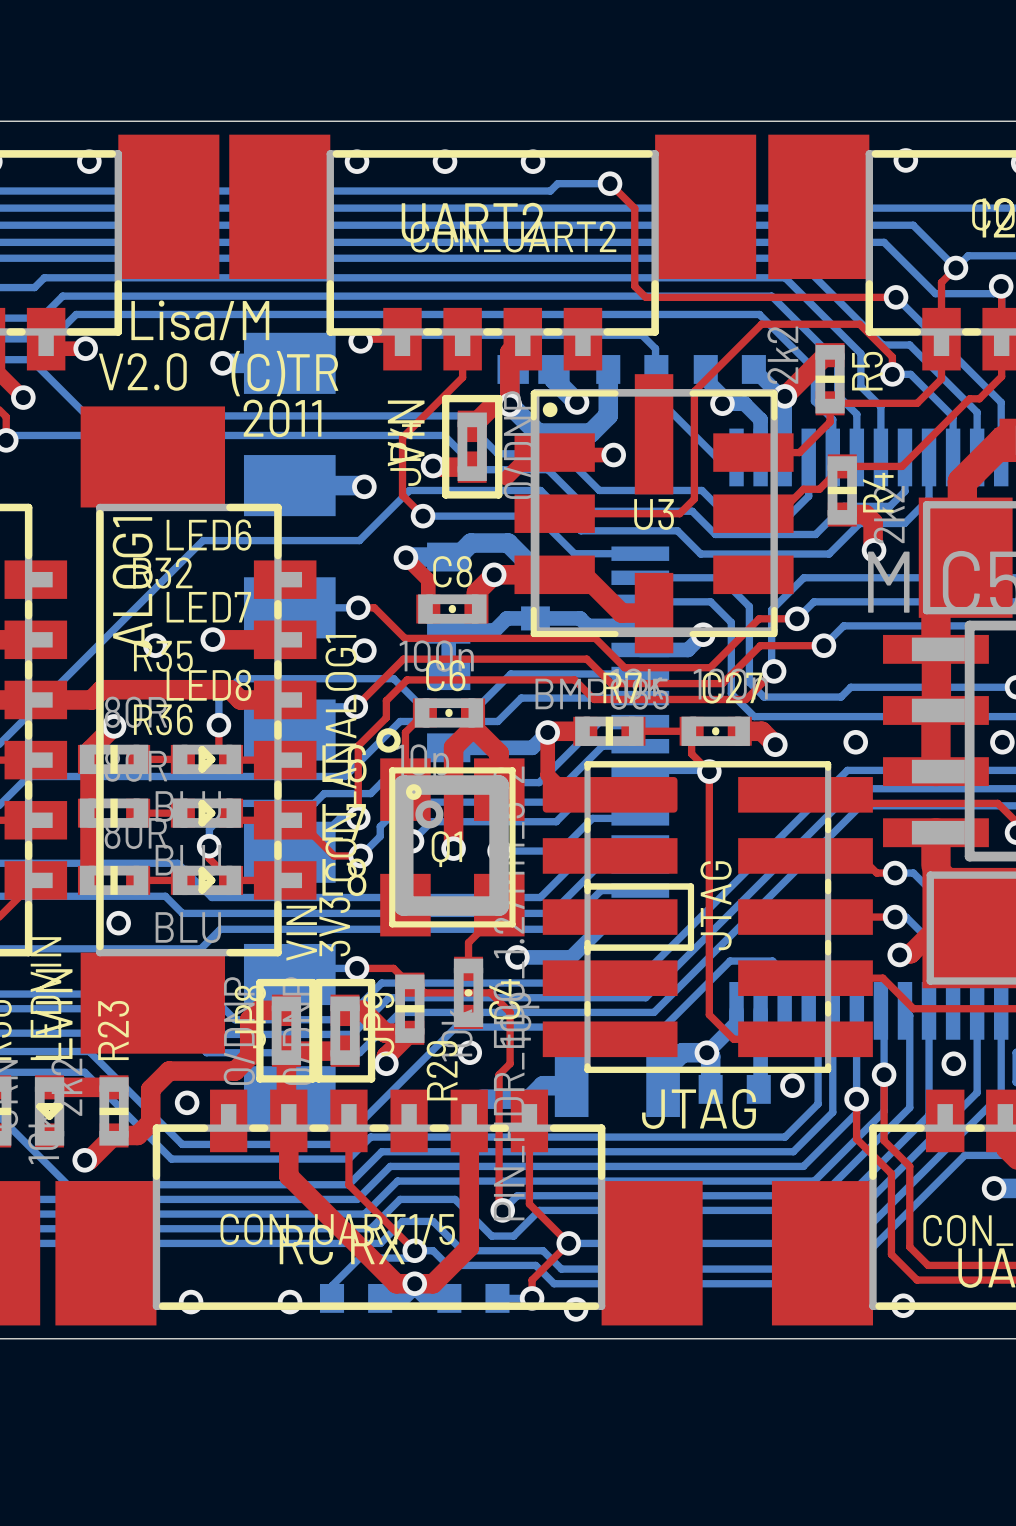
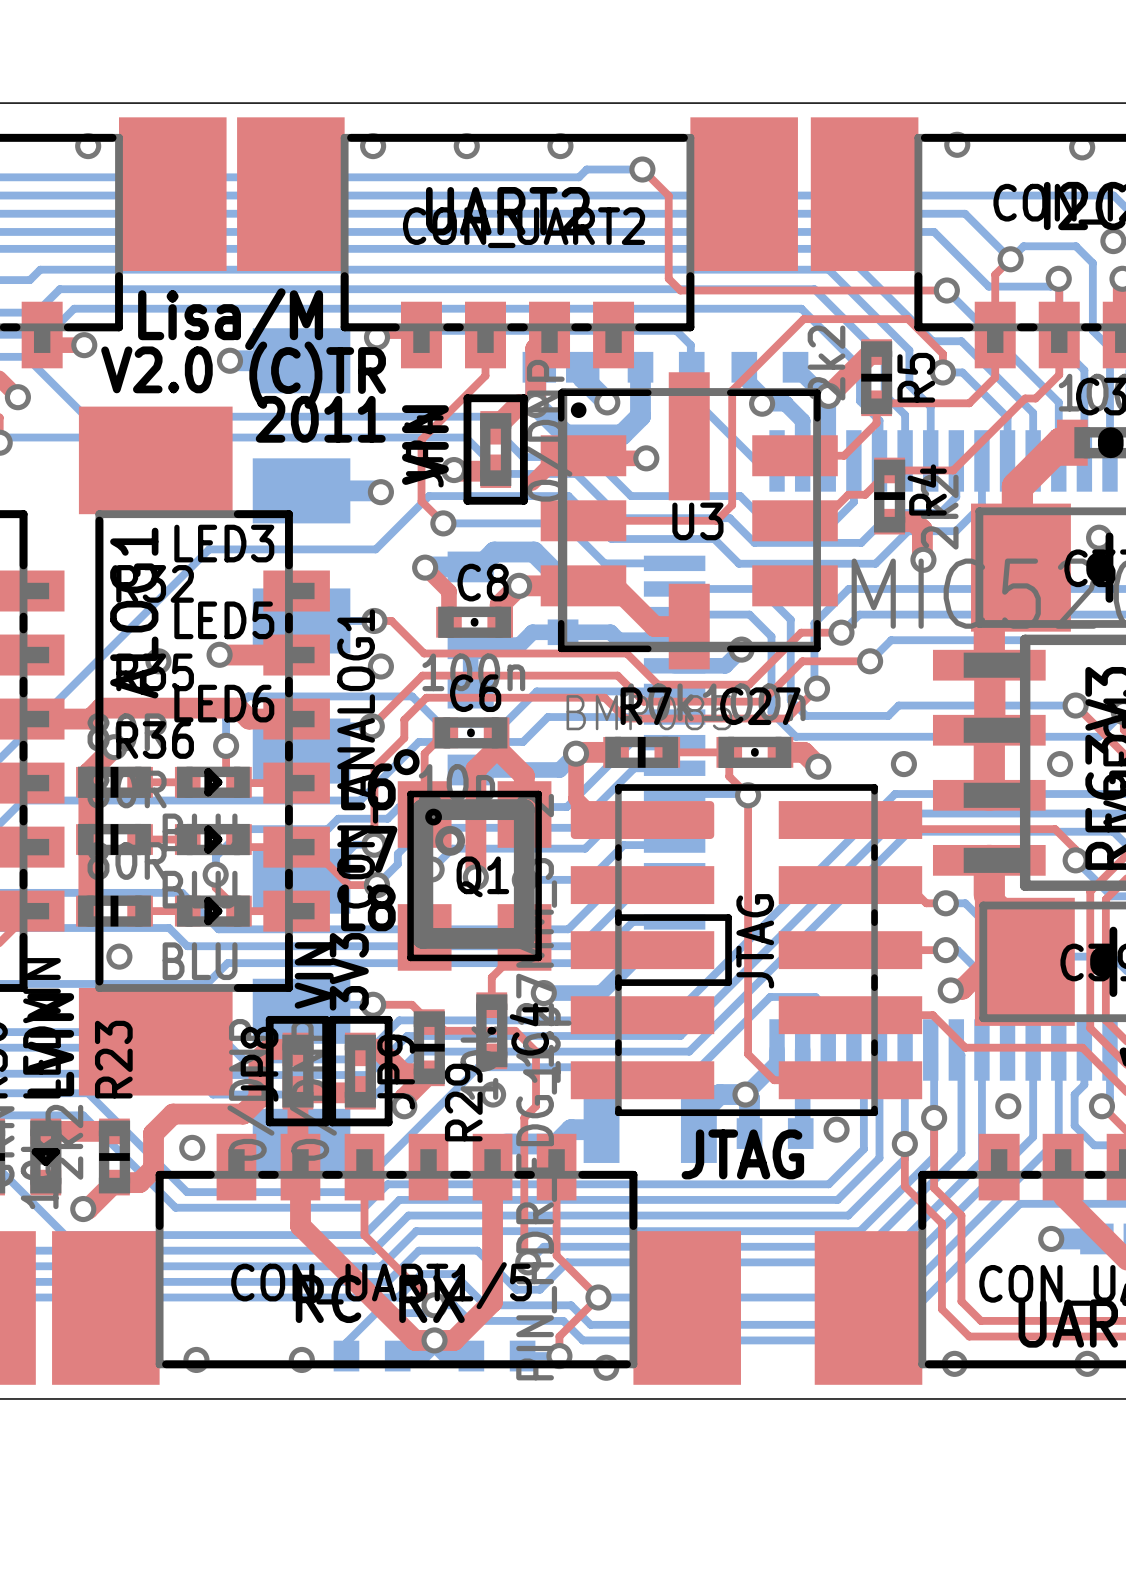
LED6 name: LED6 (209, 535) -> LED3 (224, 543)
LED7 name: LED7 (208, 607) -> LED5 (224, 620)
LED8 name: LED8 (209, 685) -> LED6 (224, 703)

